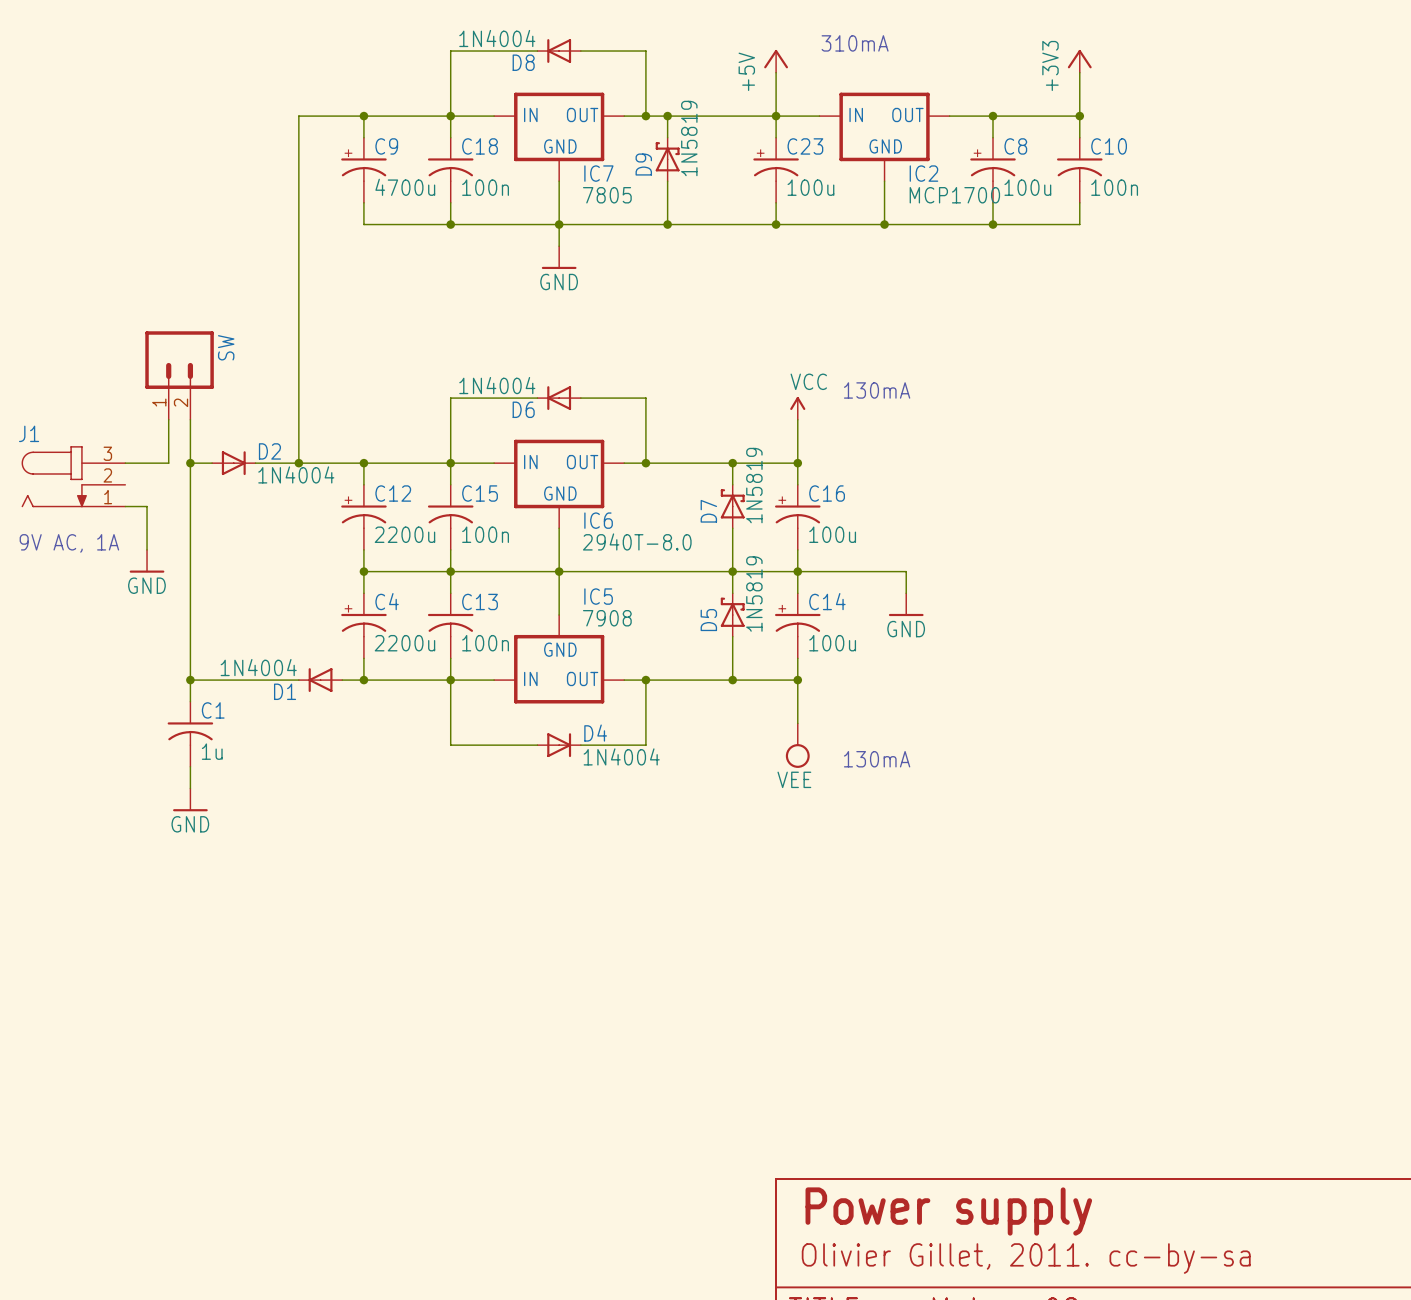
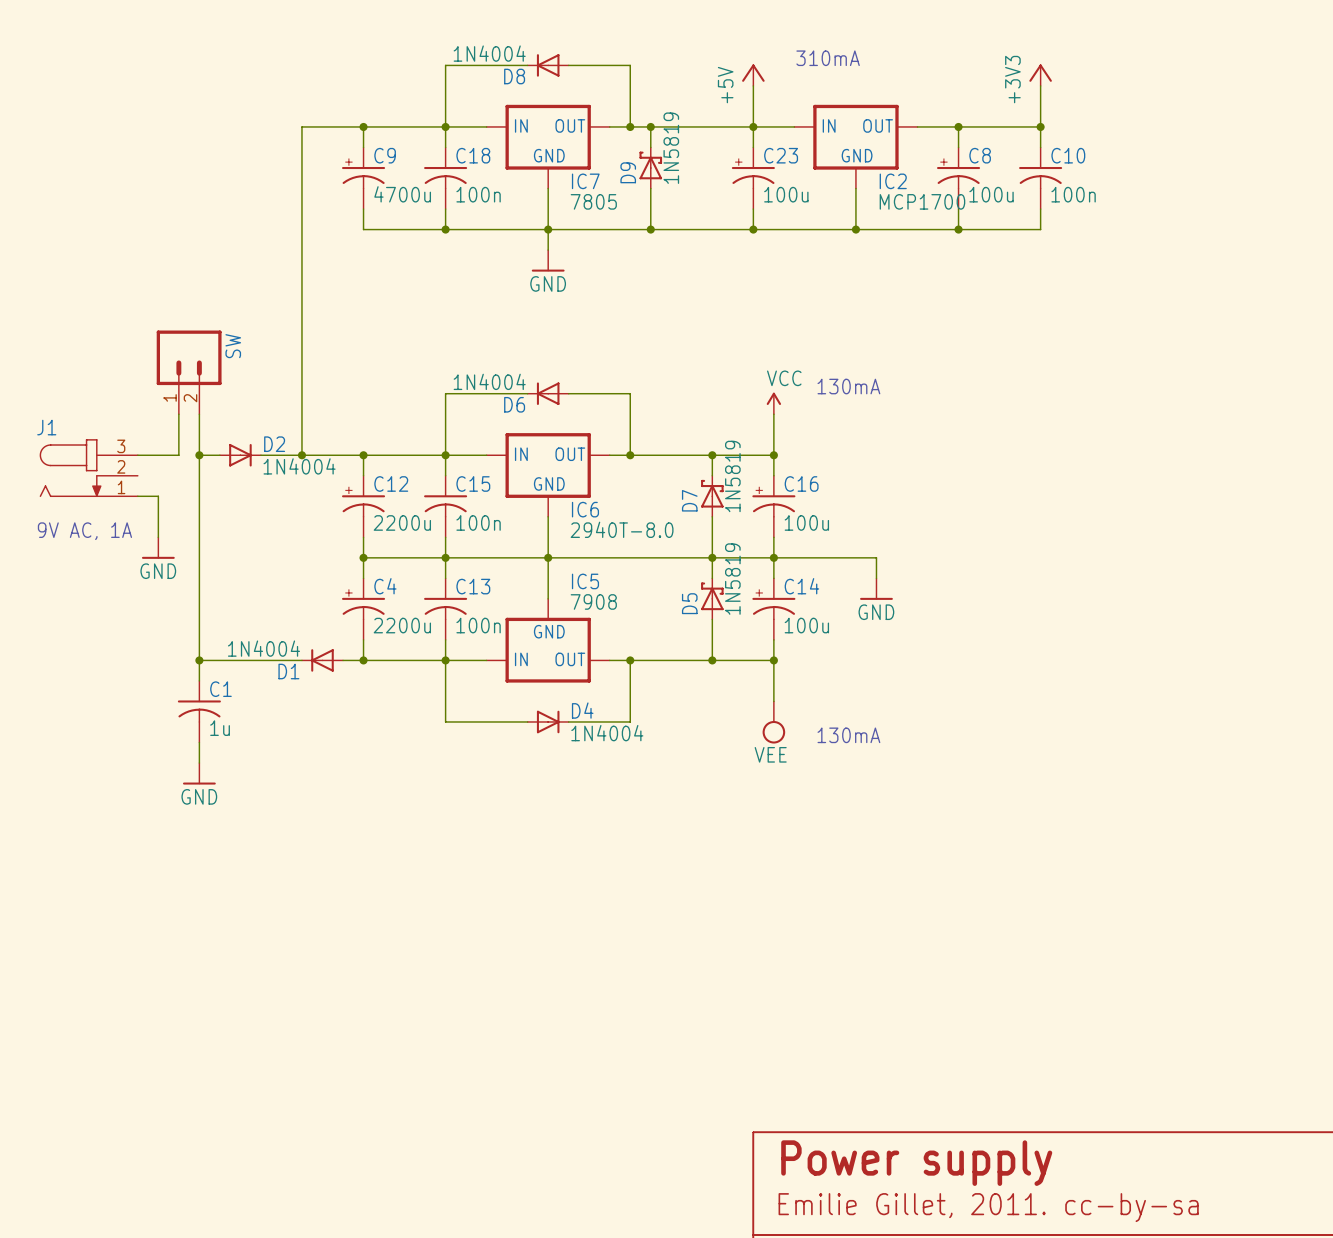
text: Olivier Gillet, 2011. cc-by-sa (1026, 1258) -> Emilie Gillet, 2011. cc-by-sa (988, 1207)

